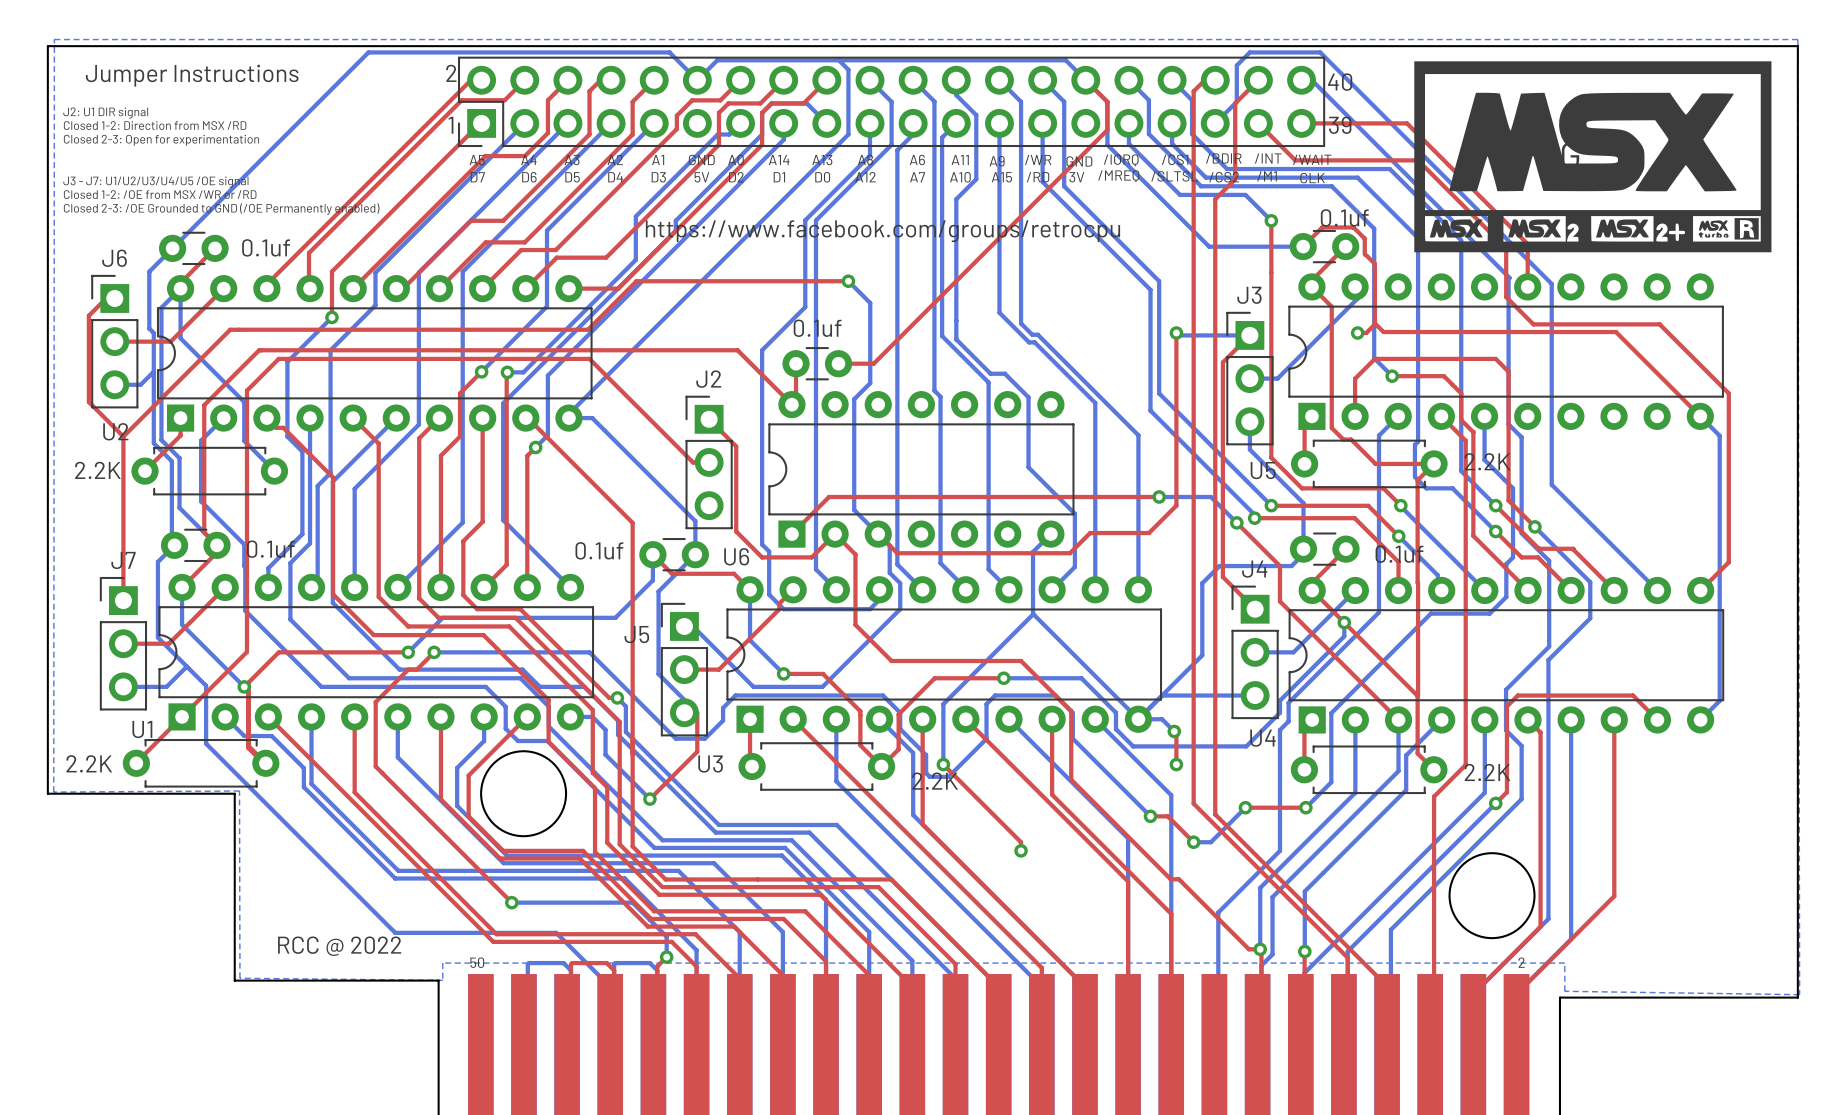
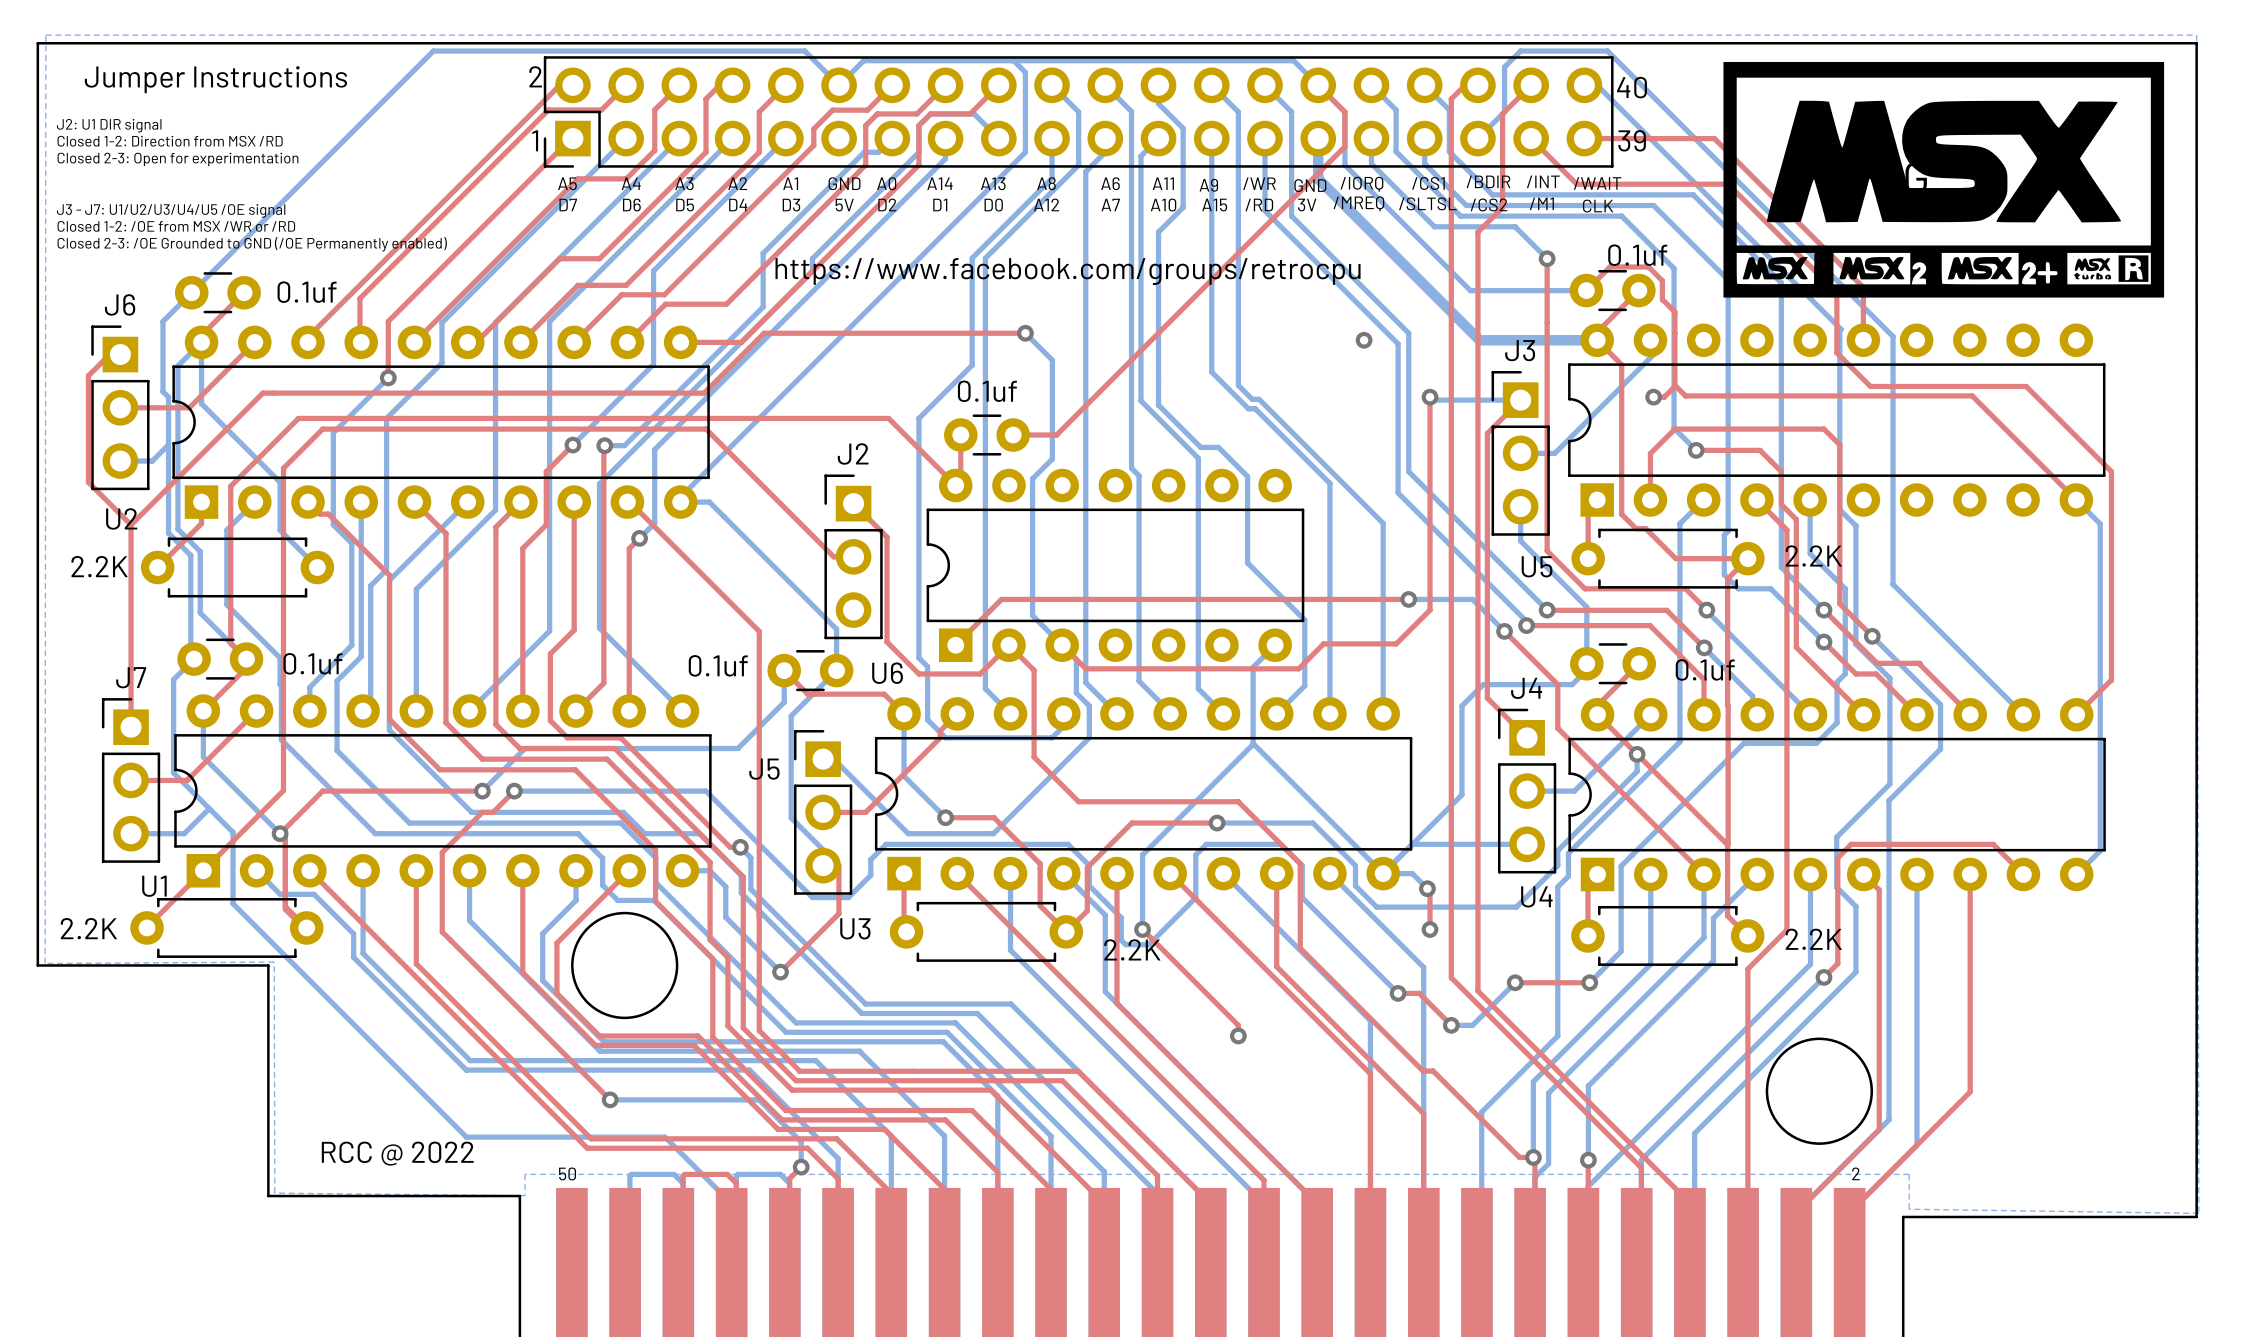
bottom track: none -> (1318, 138) (1318, 178) (1479, 340) (1597, 340)
via: none -> (1364, 340)

